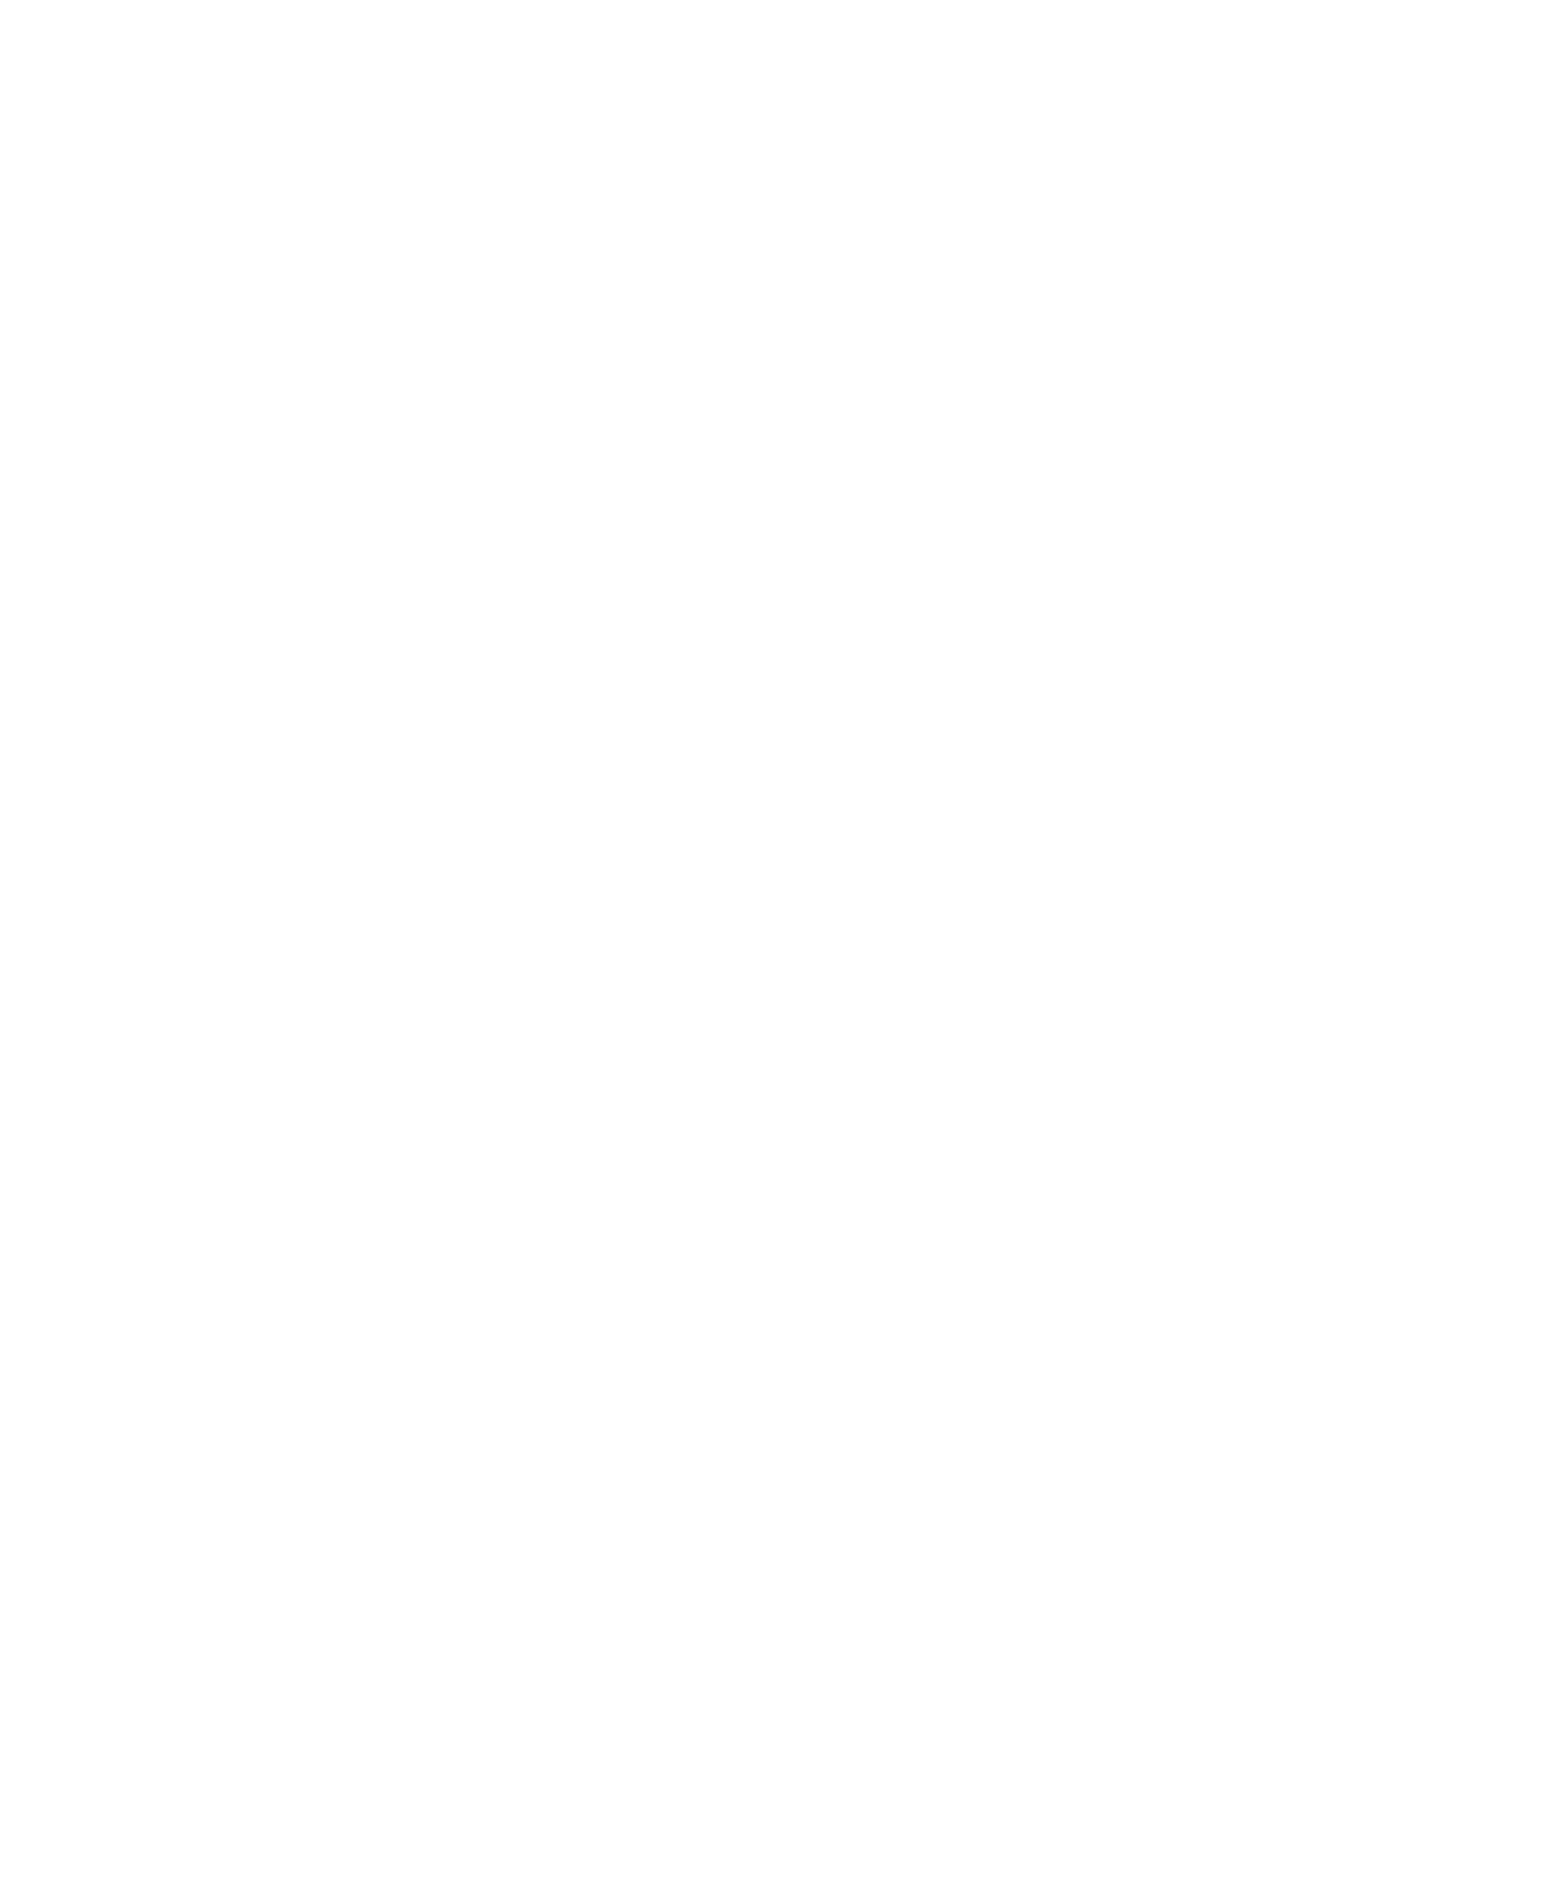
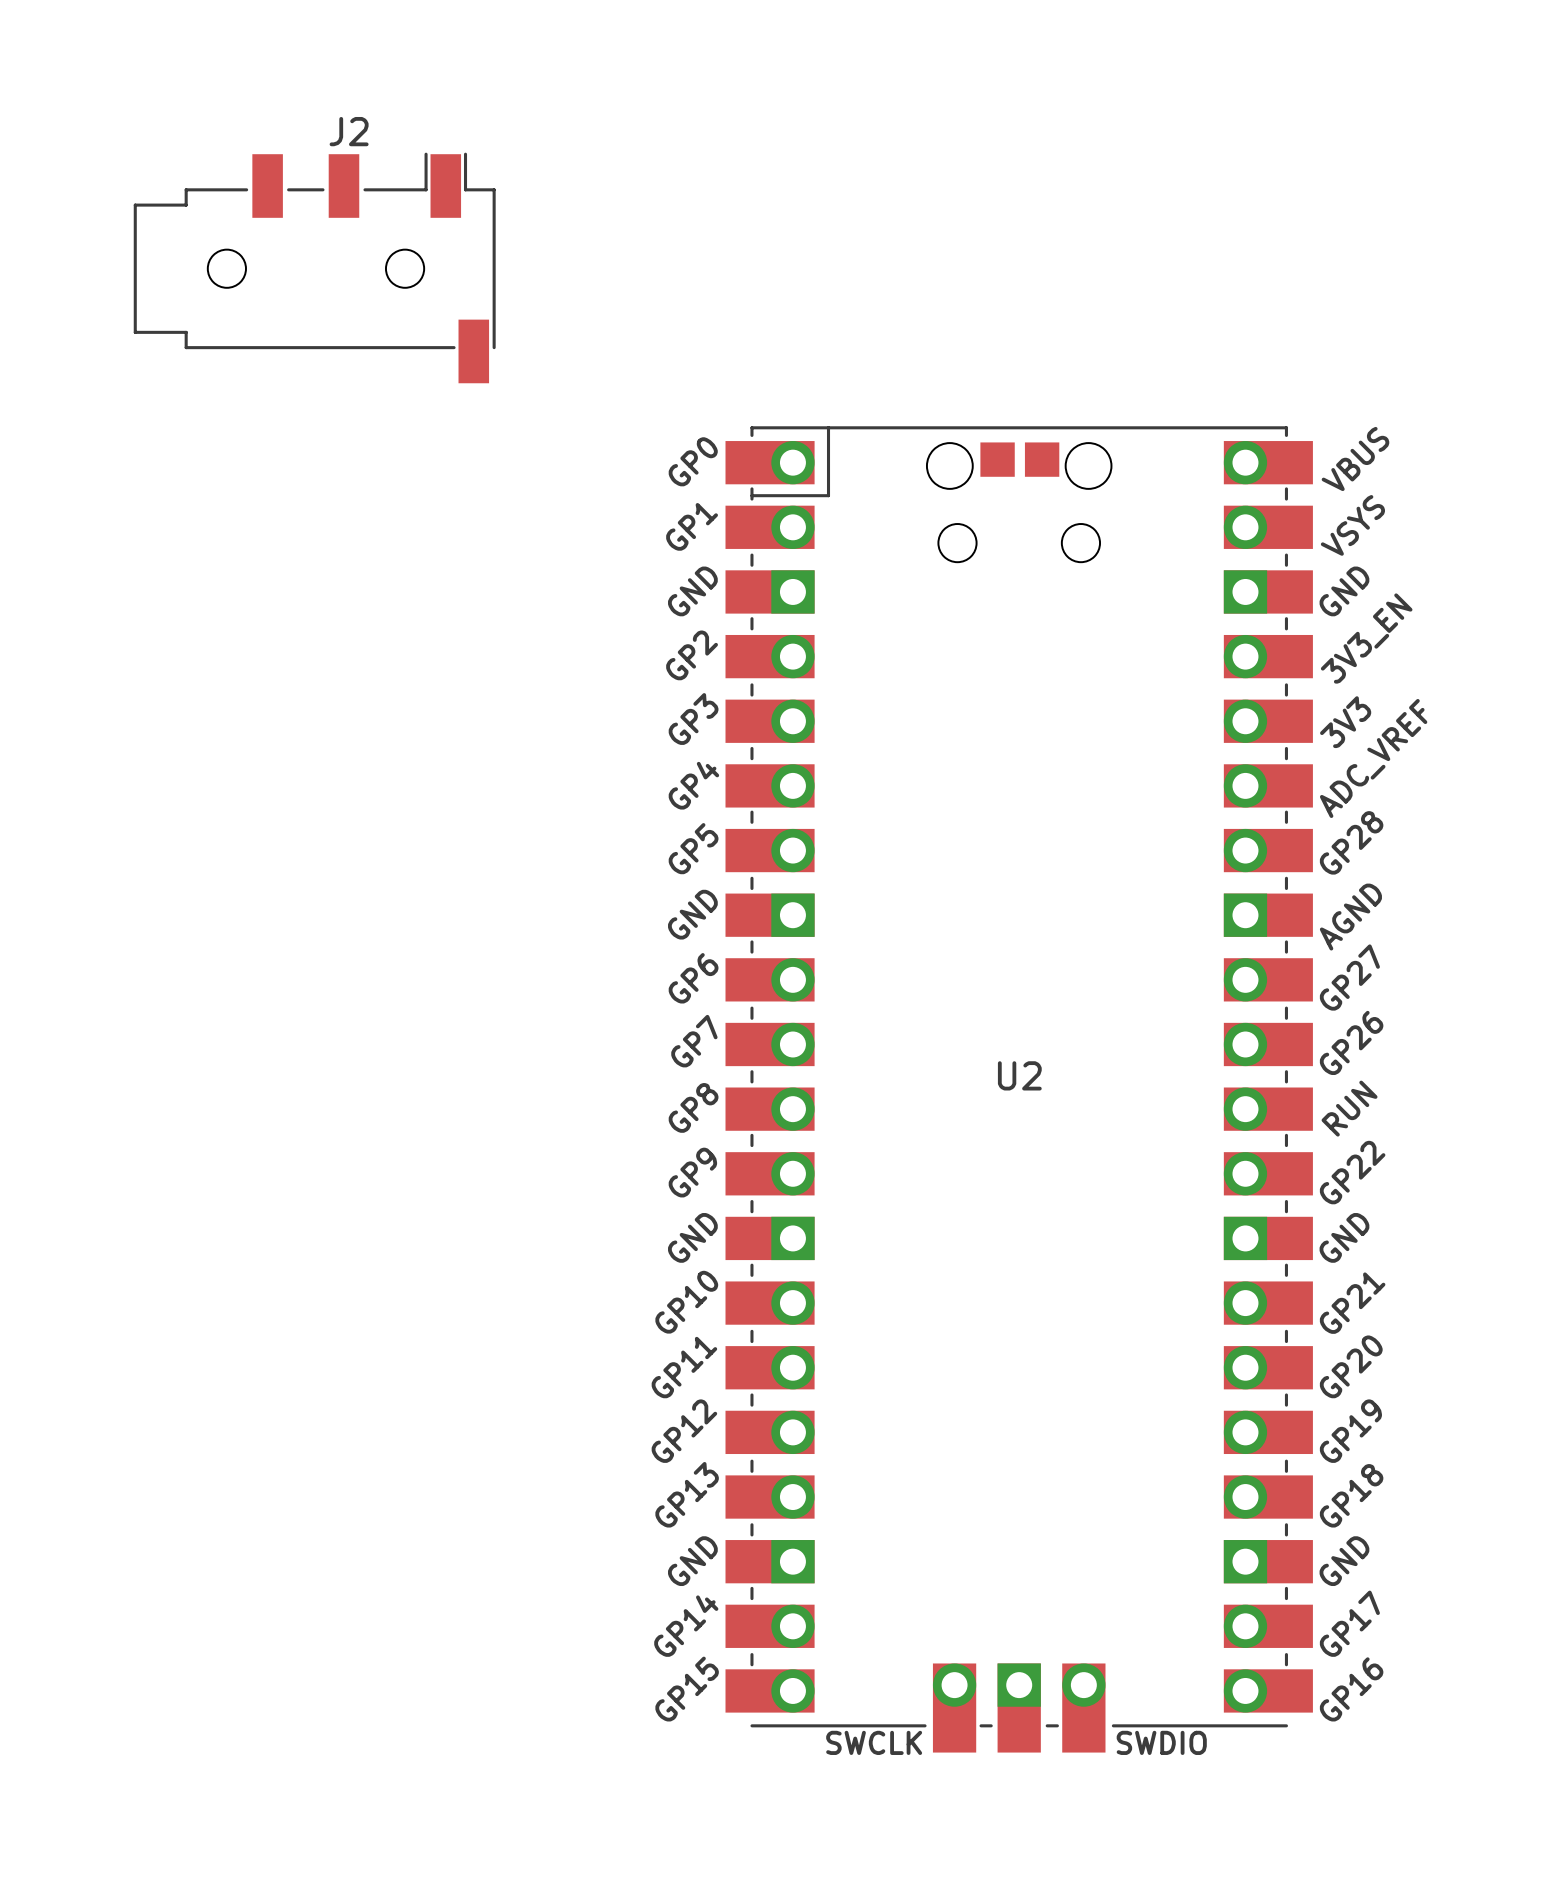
J2: none -> (314, 267)
U2: none -> (1019, 1089)

